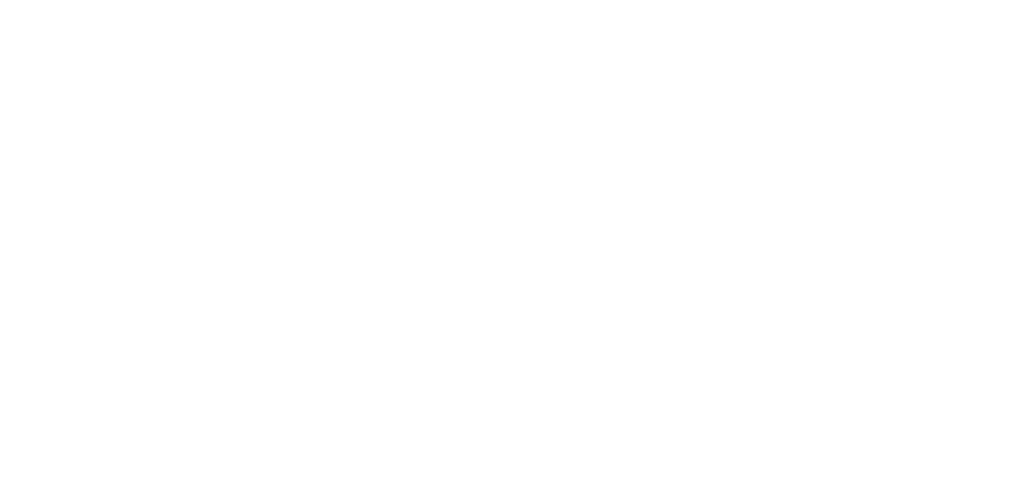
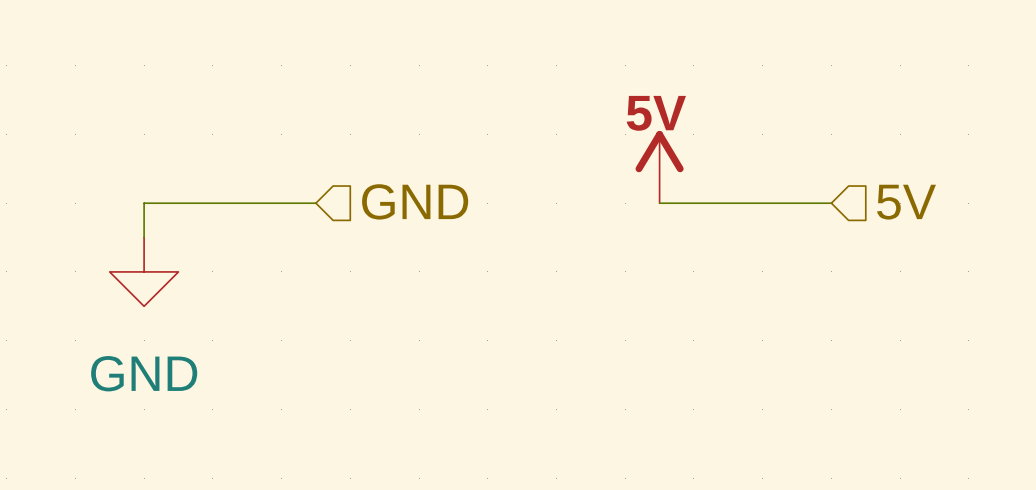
power symbol: none -> (659, 167)
hierarchical label: none -> GND (415, 201)
hierarchical label: none -> 5V (906, 202)
wire: none -> (315, 203) (144, 203) (144, 237)
wire: none -> (659, 203) (831, 203)
power symbol: none -> GND (144, 271)

